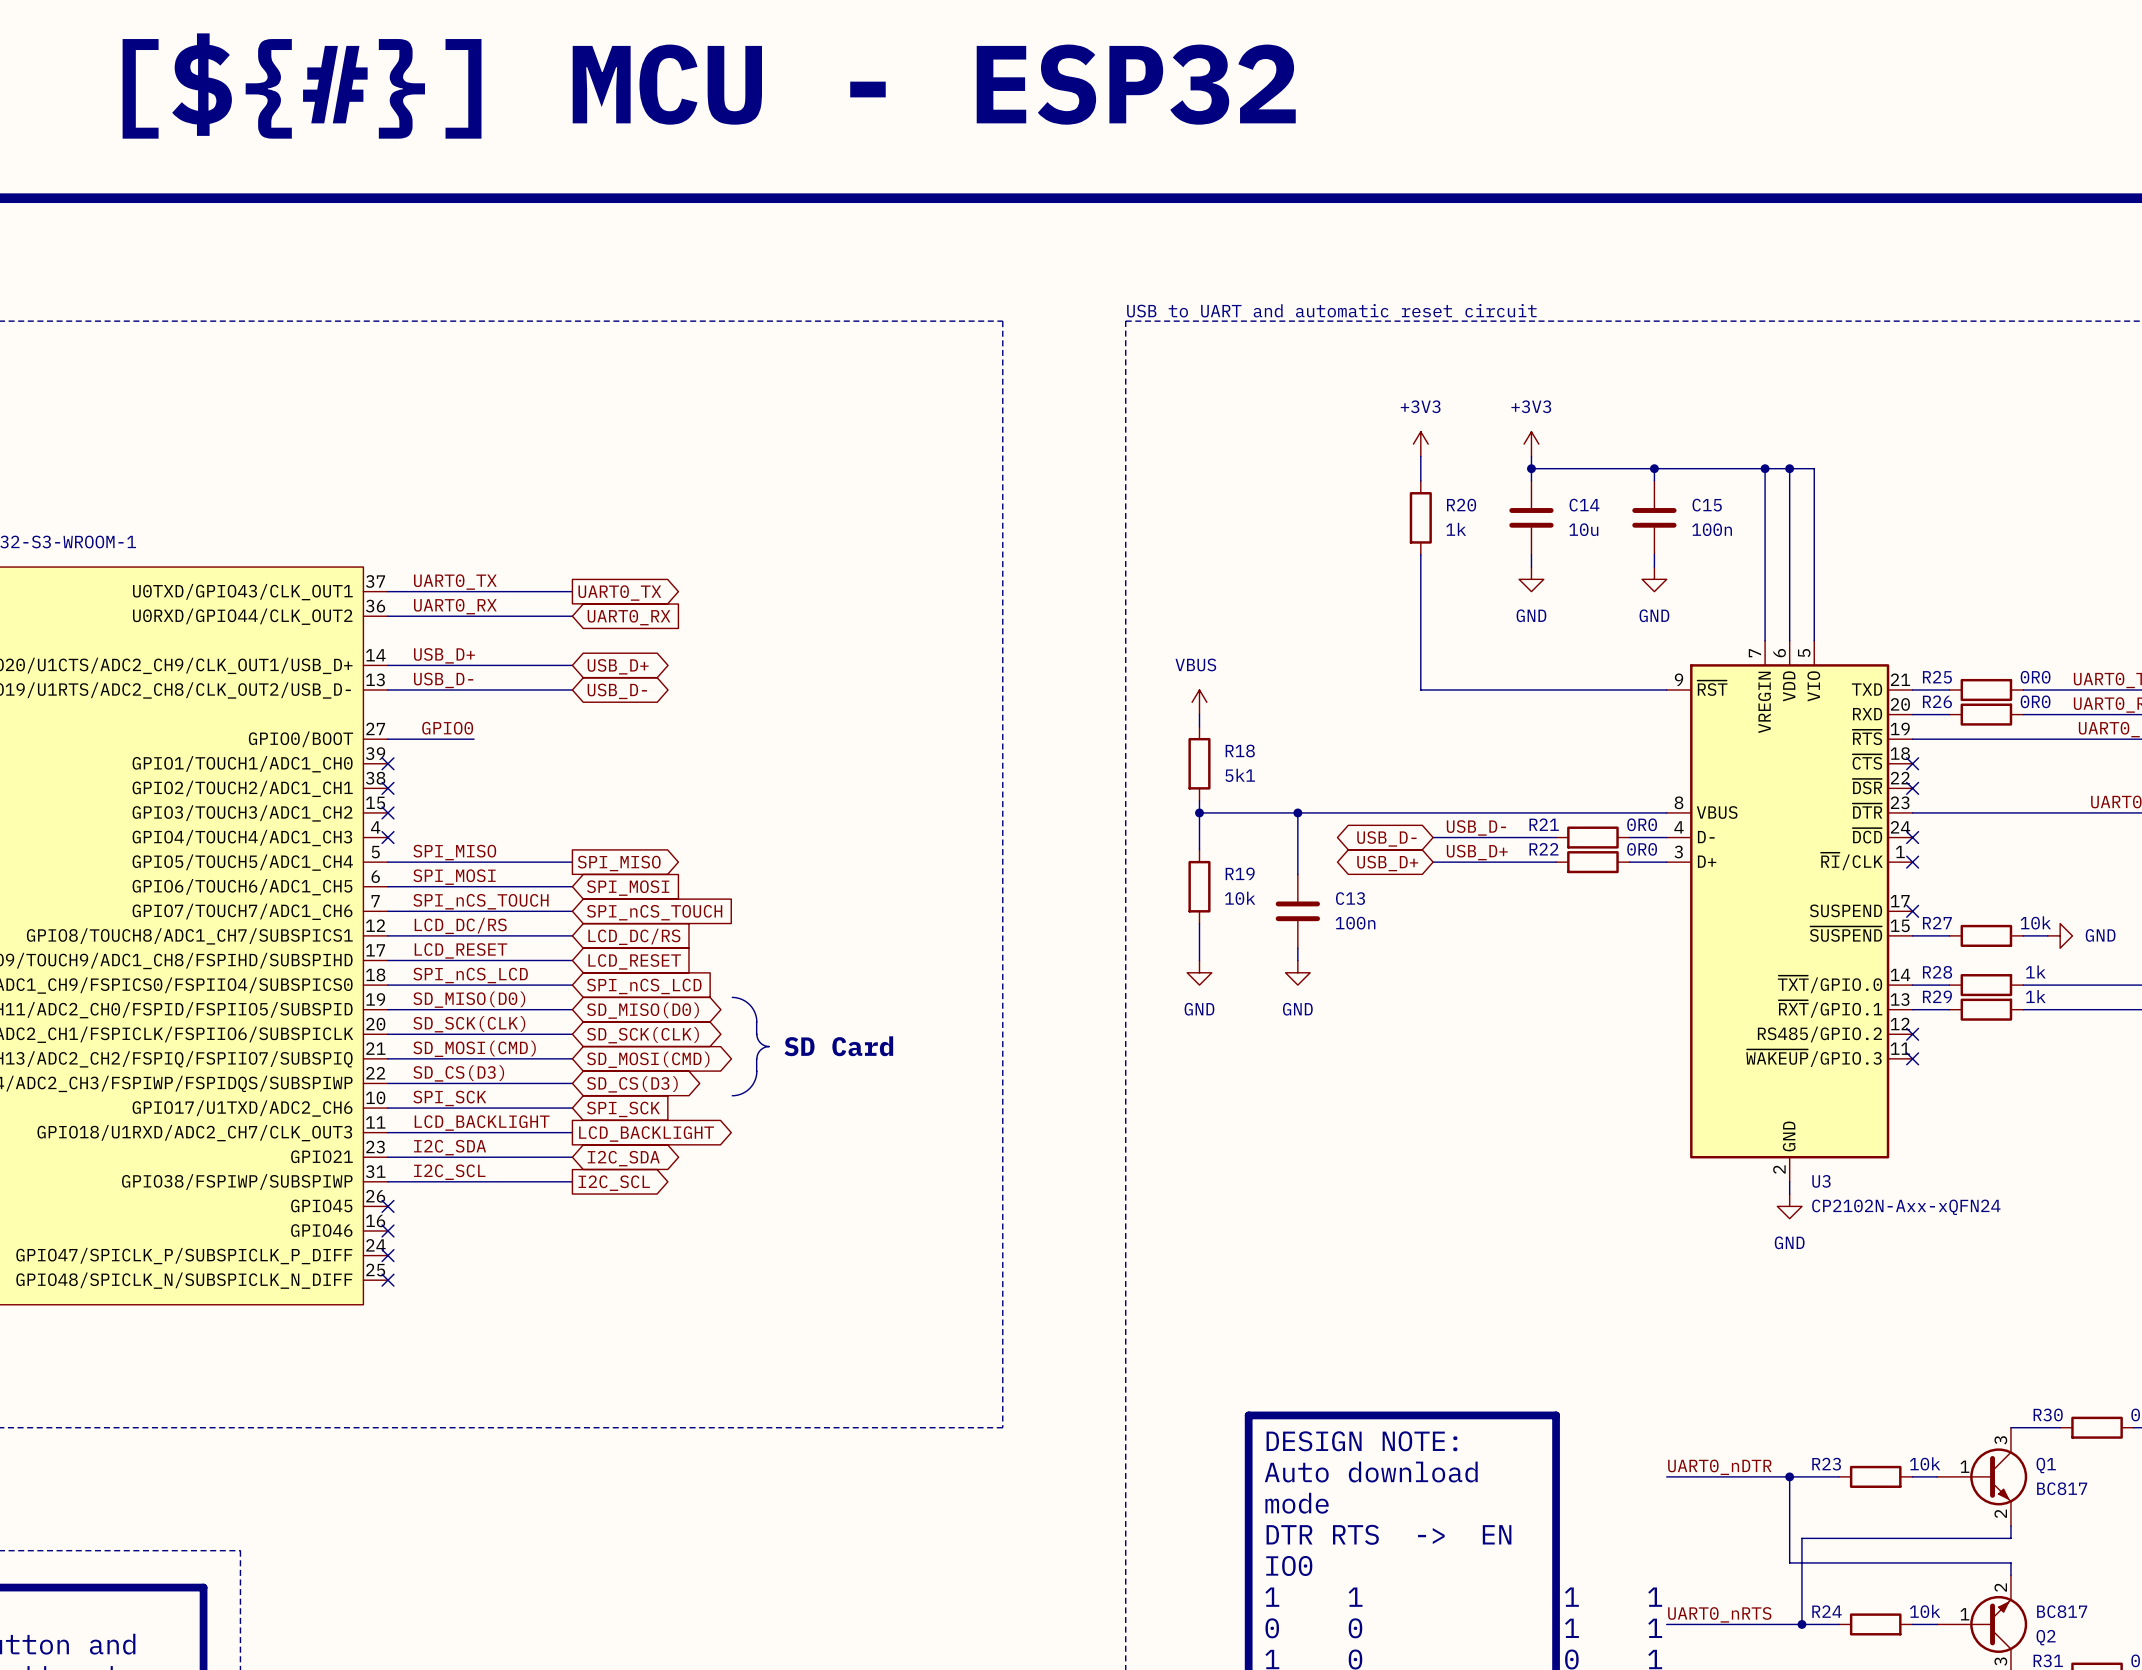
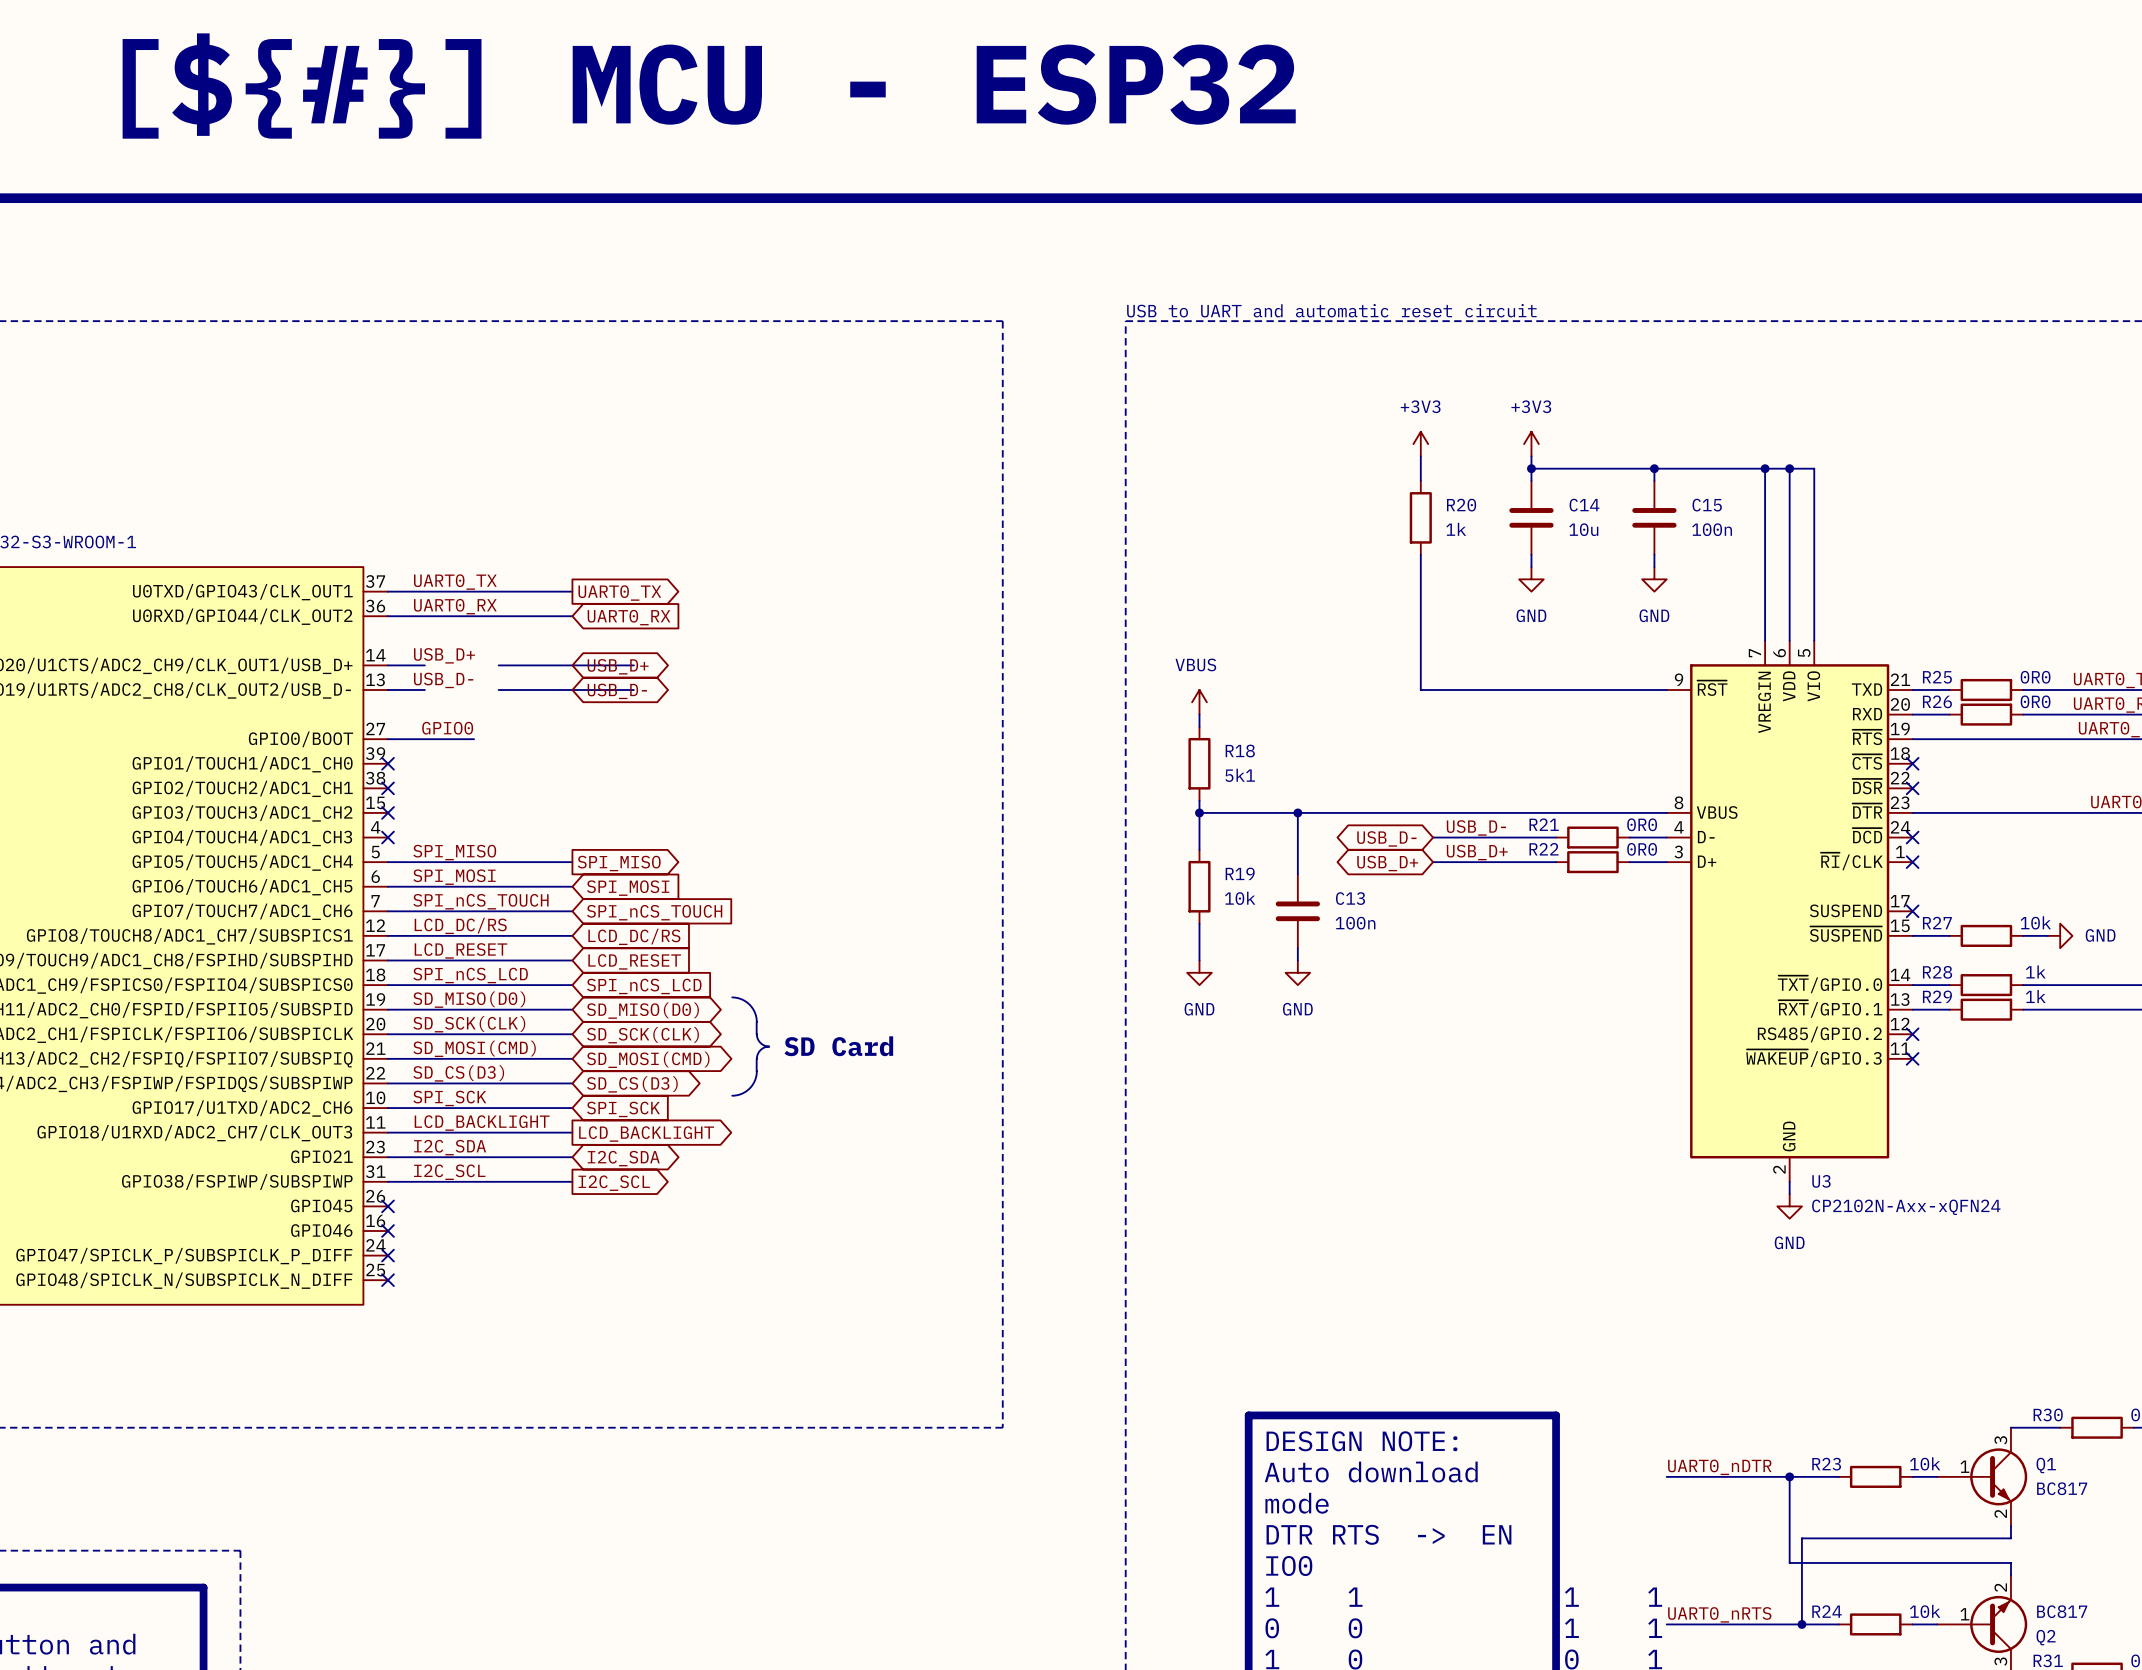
wire: (424, 665) (498, 665) -> none
wire: none -> (572, 665) (633, 665)
wire: (424, 690) (498, 690) -> none
wire: none -> (572, 690) (633, 690)

